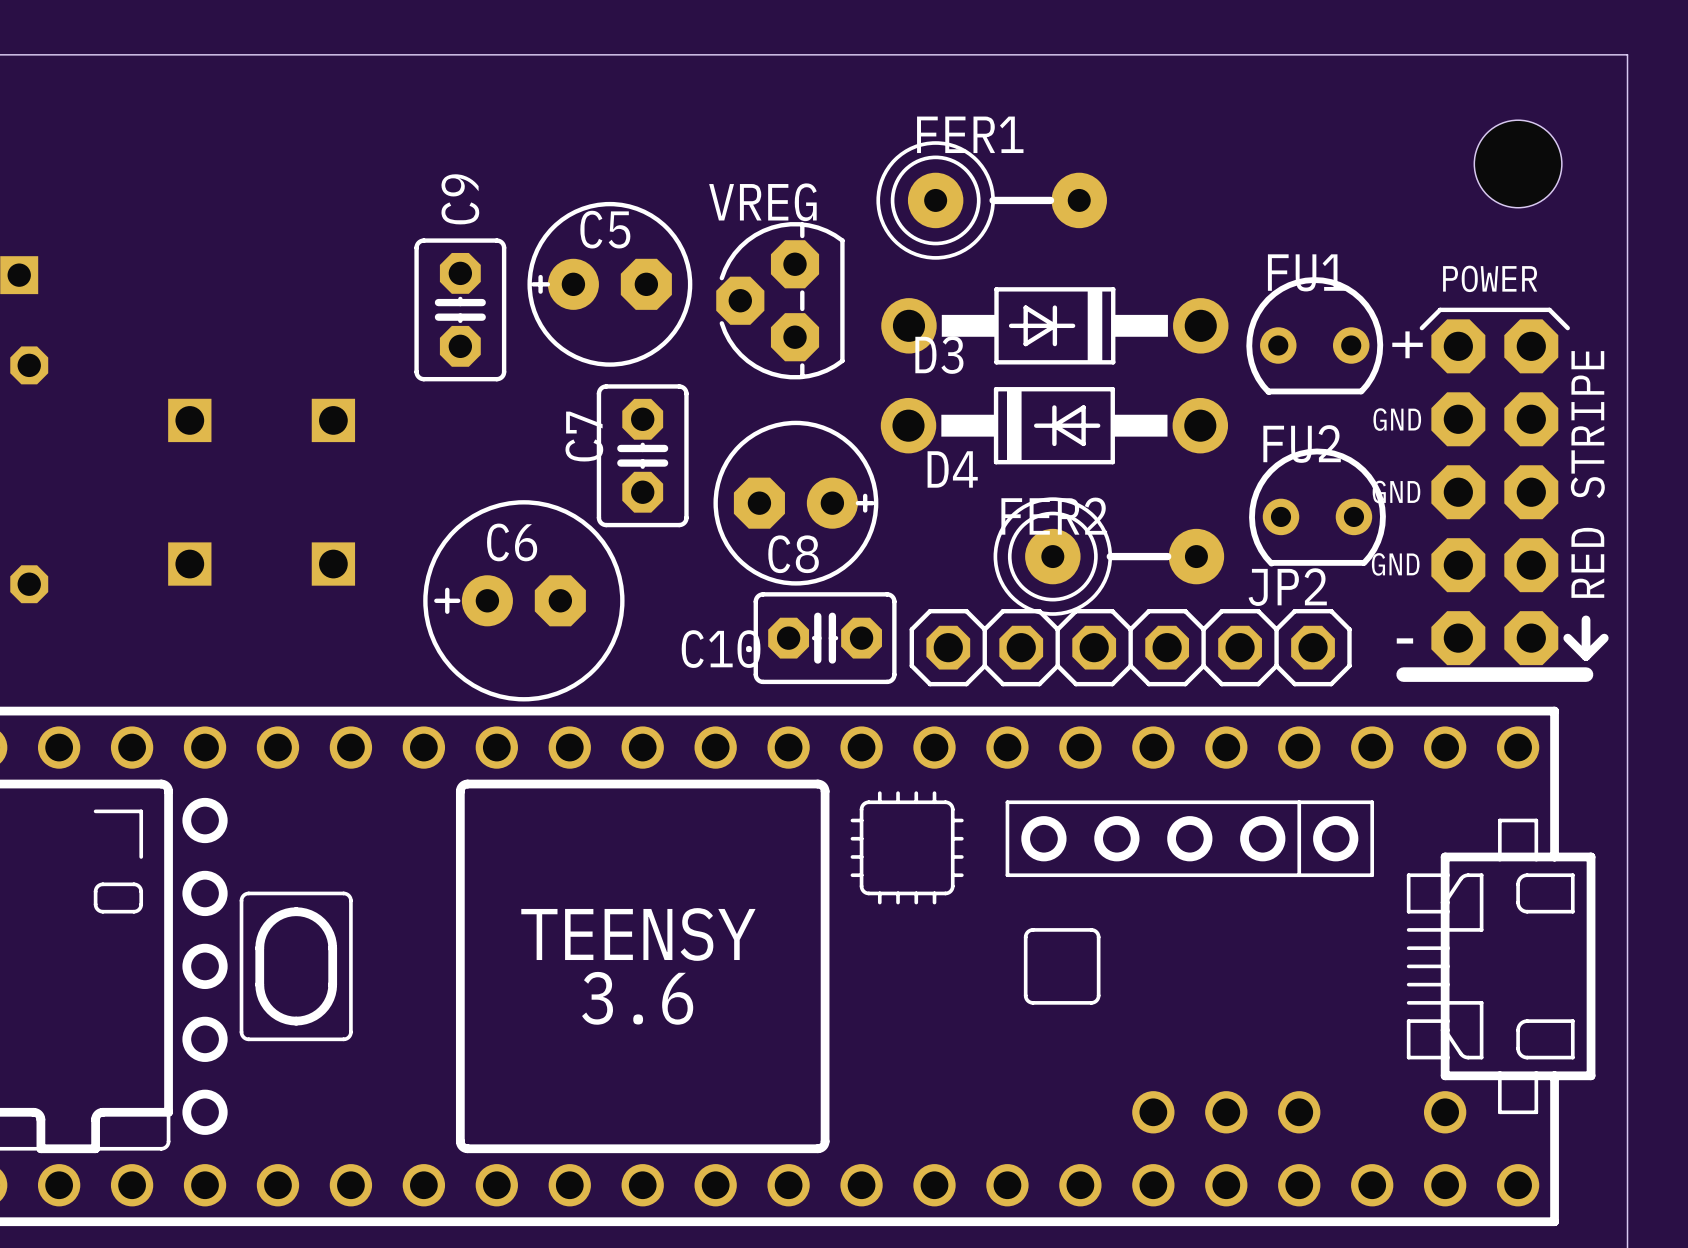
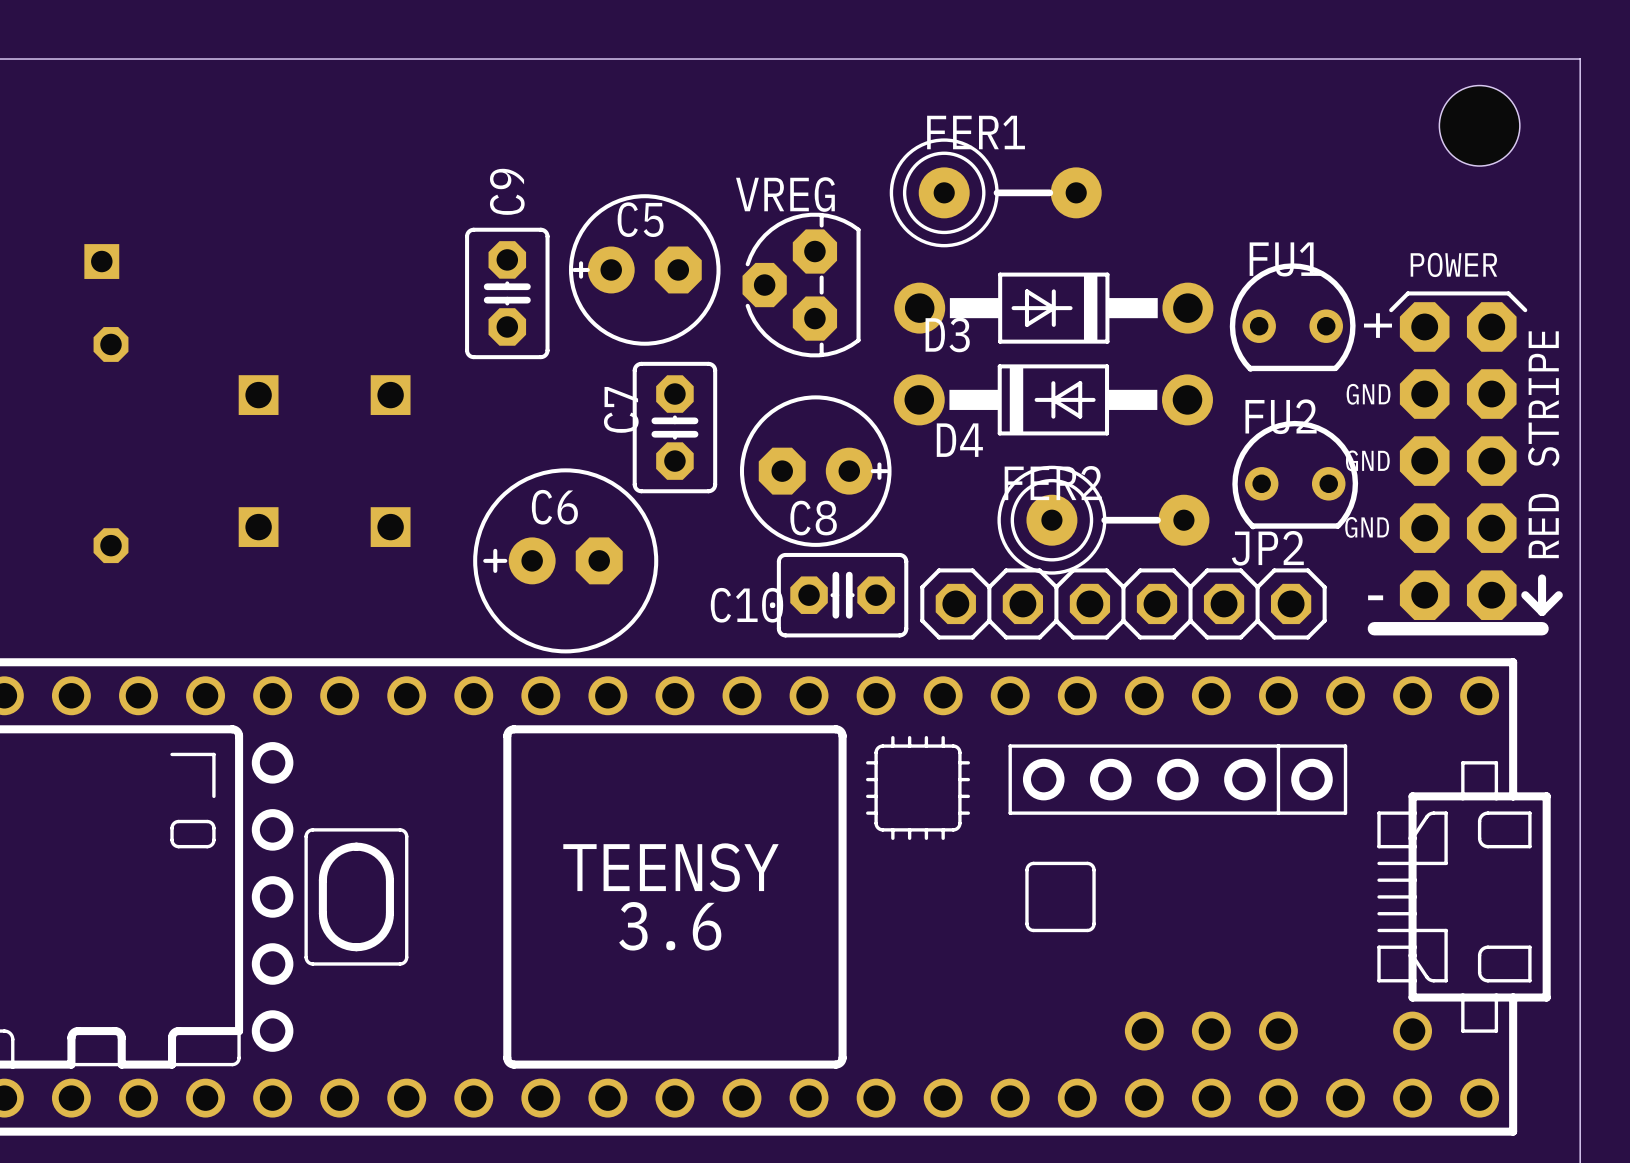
hole position: (1518, 163) -> (1479, 125)

